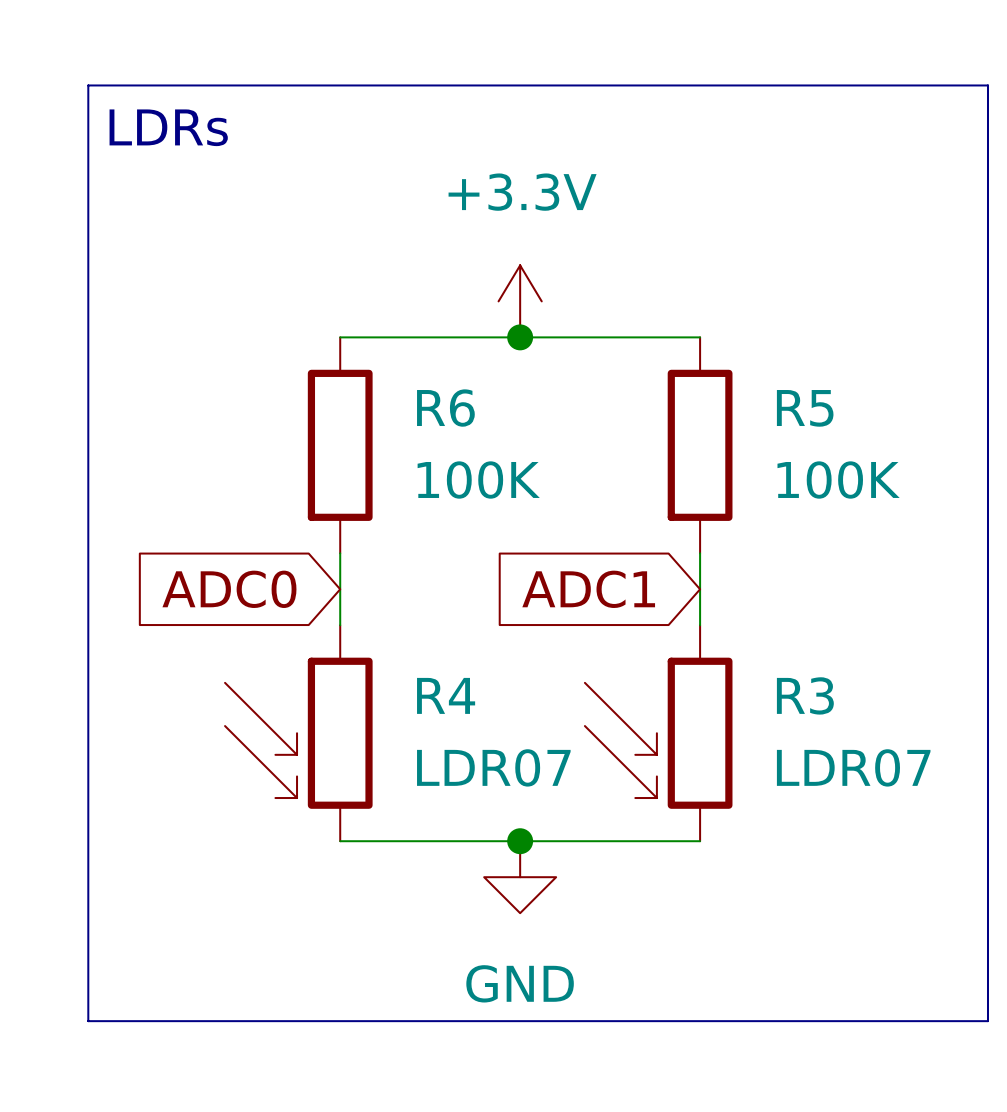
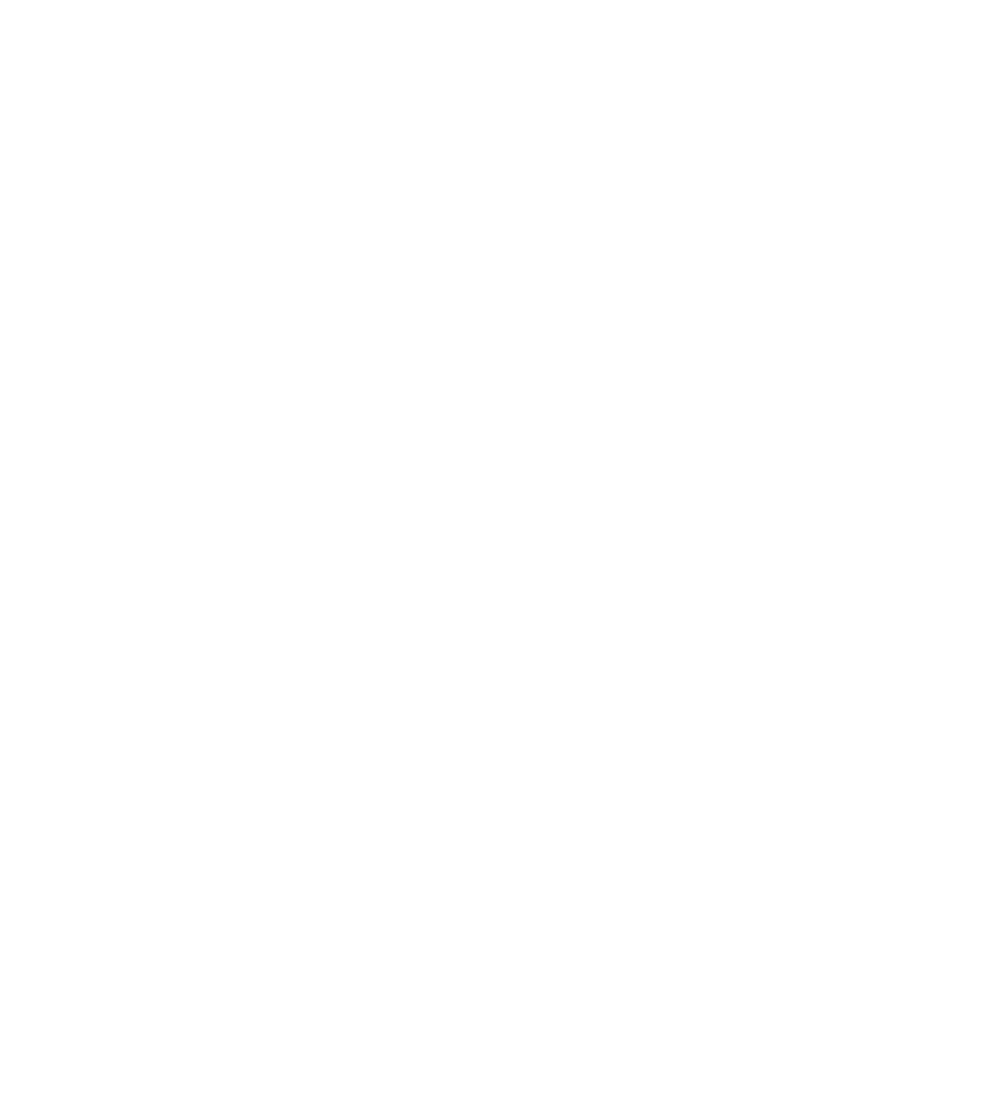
line: (88, 85) (987, 85) (987, 1021) (88, 1021) (88, 85) -> none
text: LDRs (168, 127) -> none
power symbol: +3.3V (520, 301) -> none
wire: (340, 337) (700, 337) -> none
junction: (520, 337) -> none
R6: 100K (340, 445) -> none
R5: 100K (700, 445) -> none
wire: (340, 553) (340, 625) -> none
wire: (700, 553) (700, 625) -> none
global label: ADC0 (229, 589) -> none
global label: ADC1 (588, 589) -> none
R4: LDR07 (298, 733) -> none
R3: LDR07 (658, 733) -> none
wire: (340, 841) (700, 841) -> none
junction: (520, 841) -> none
power symbol: GND (520, 877) -> none

